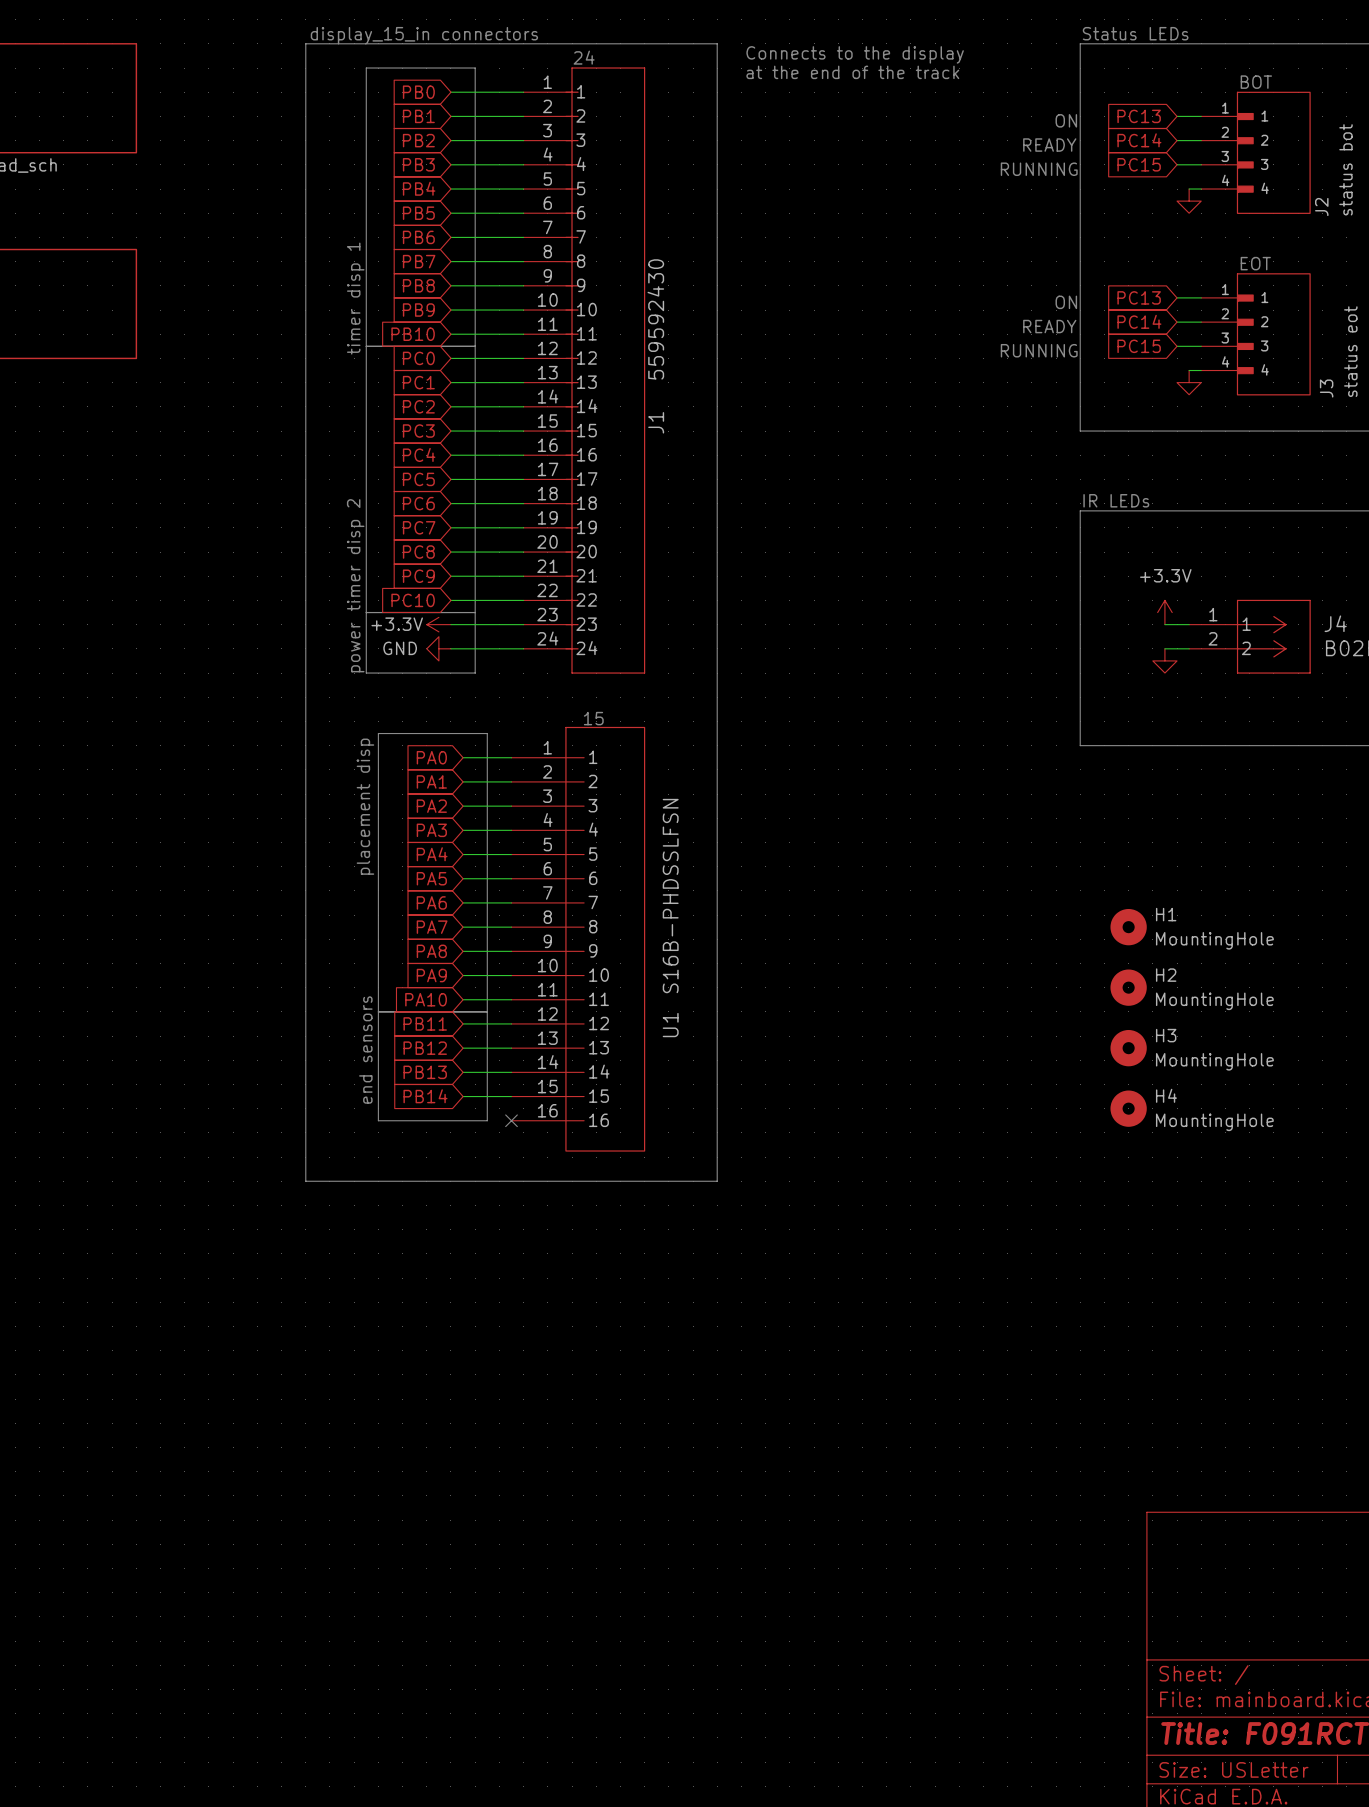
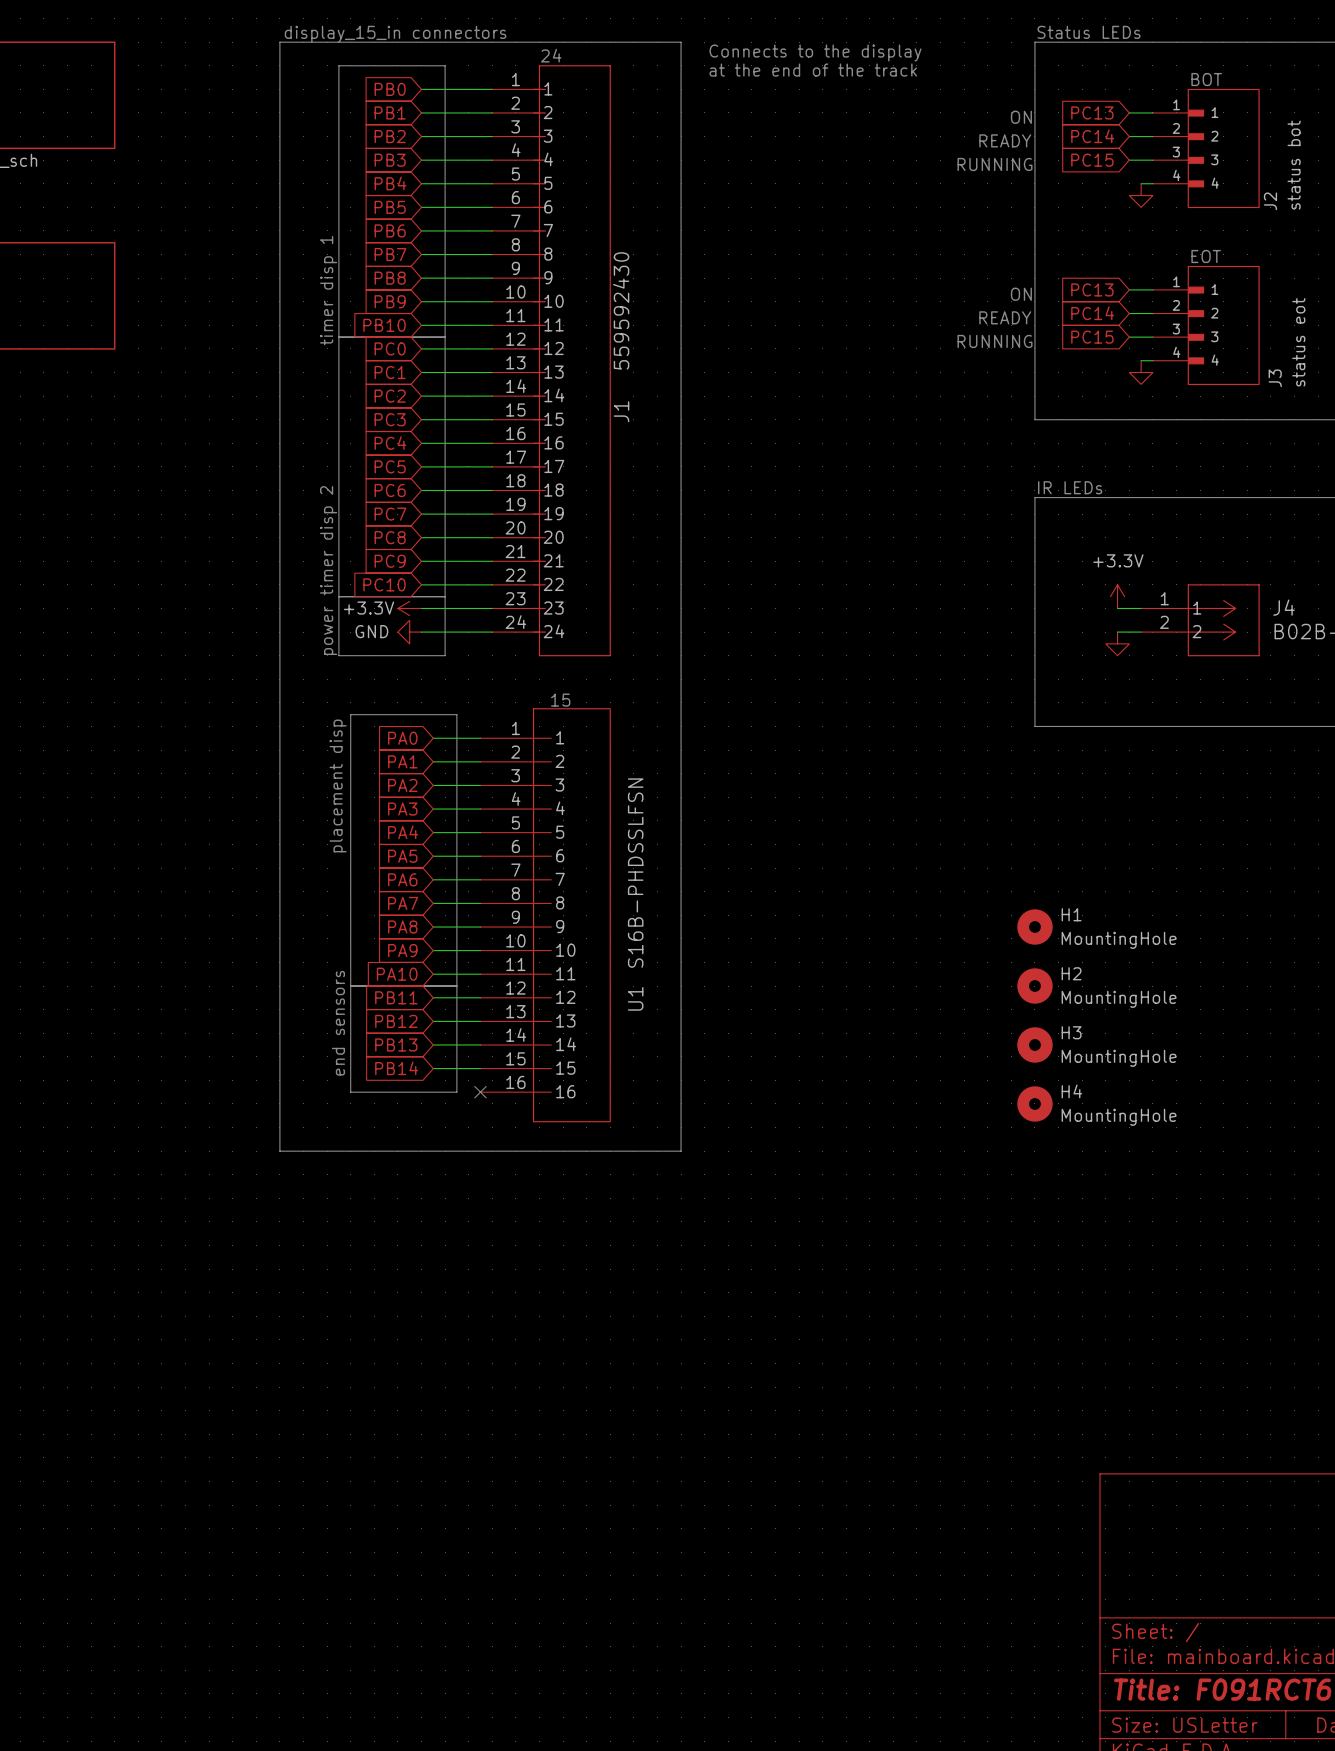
H1 position: (1128, 927) -> (1034, 927)
H2 position: (1128, 987) -> (1034, 986)
H3 position: (1128, 1048) -> (1034, 1044)
H4 position: (1128, 1108) -> (1034, 1103)

